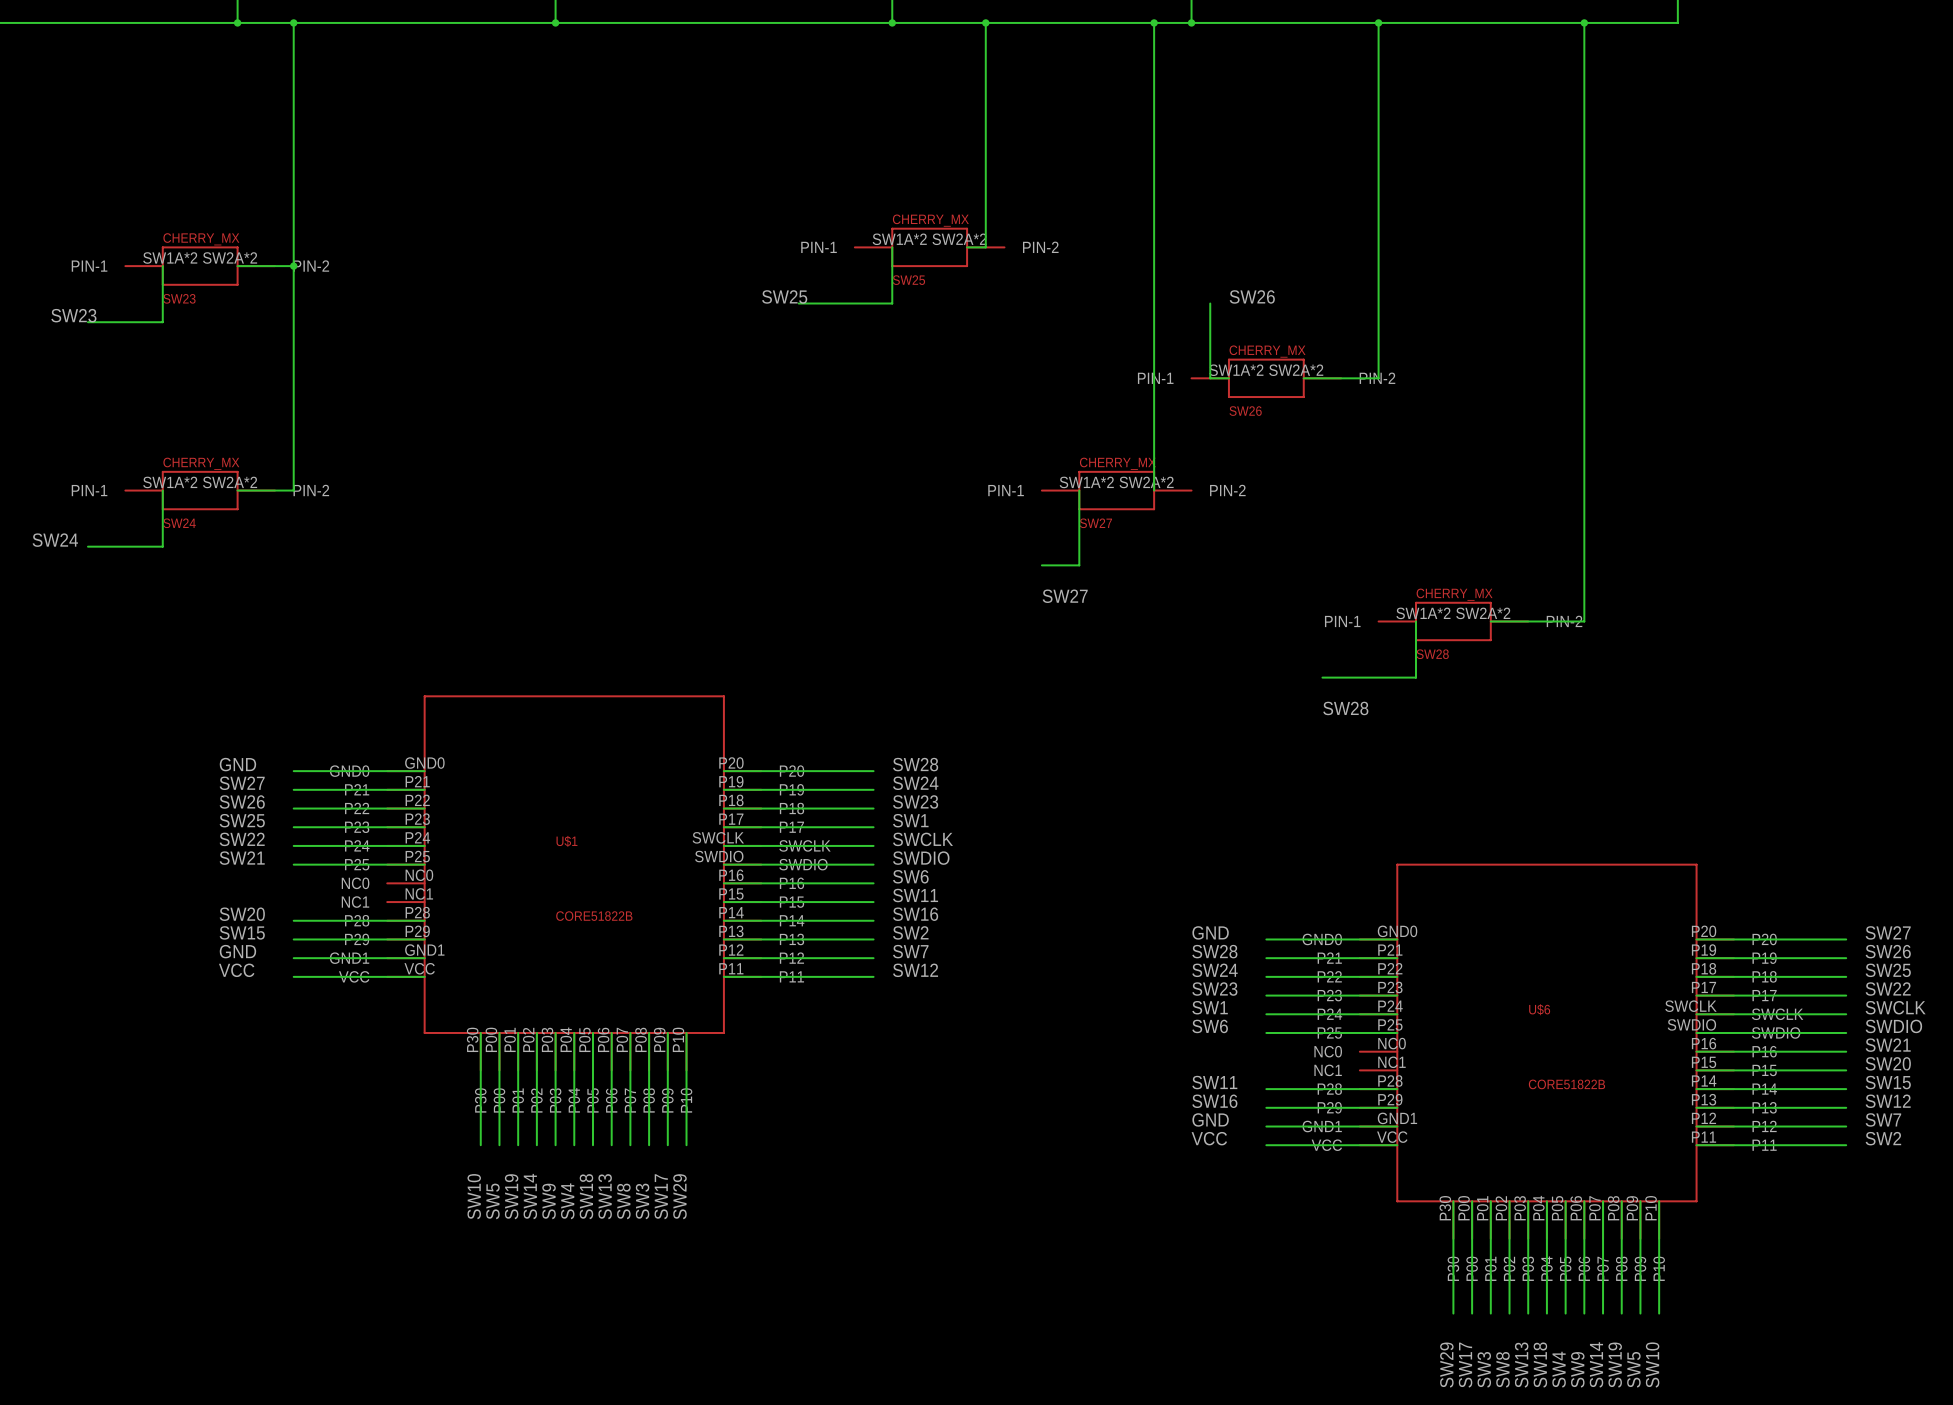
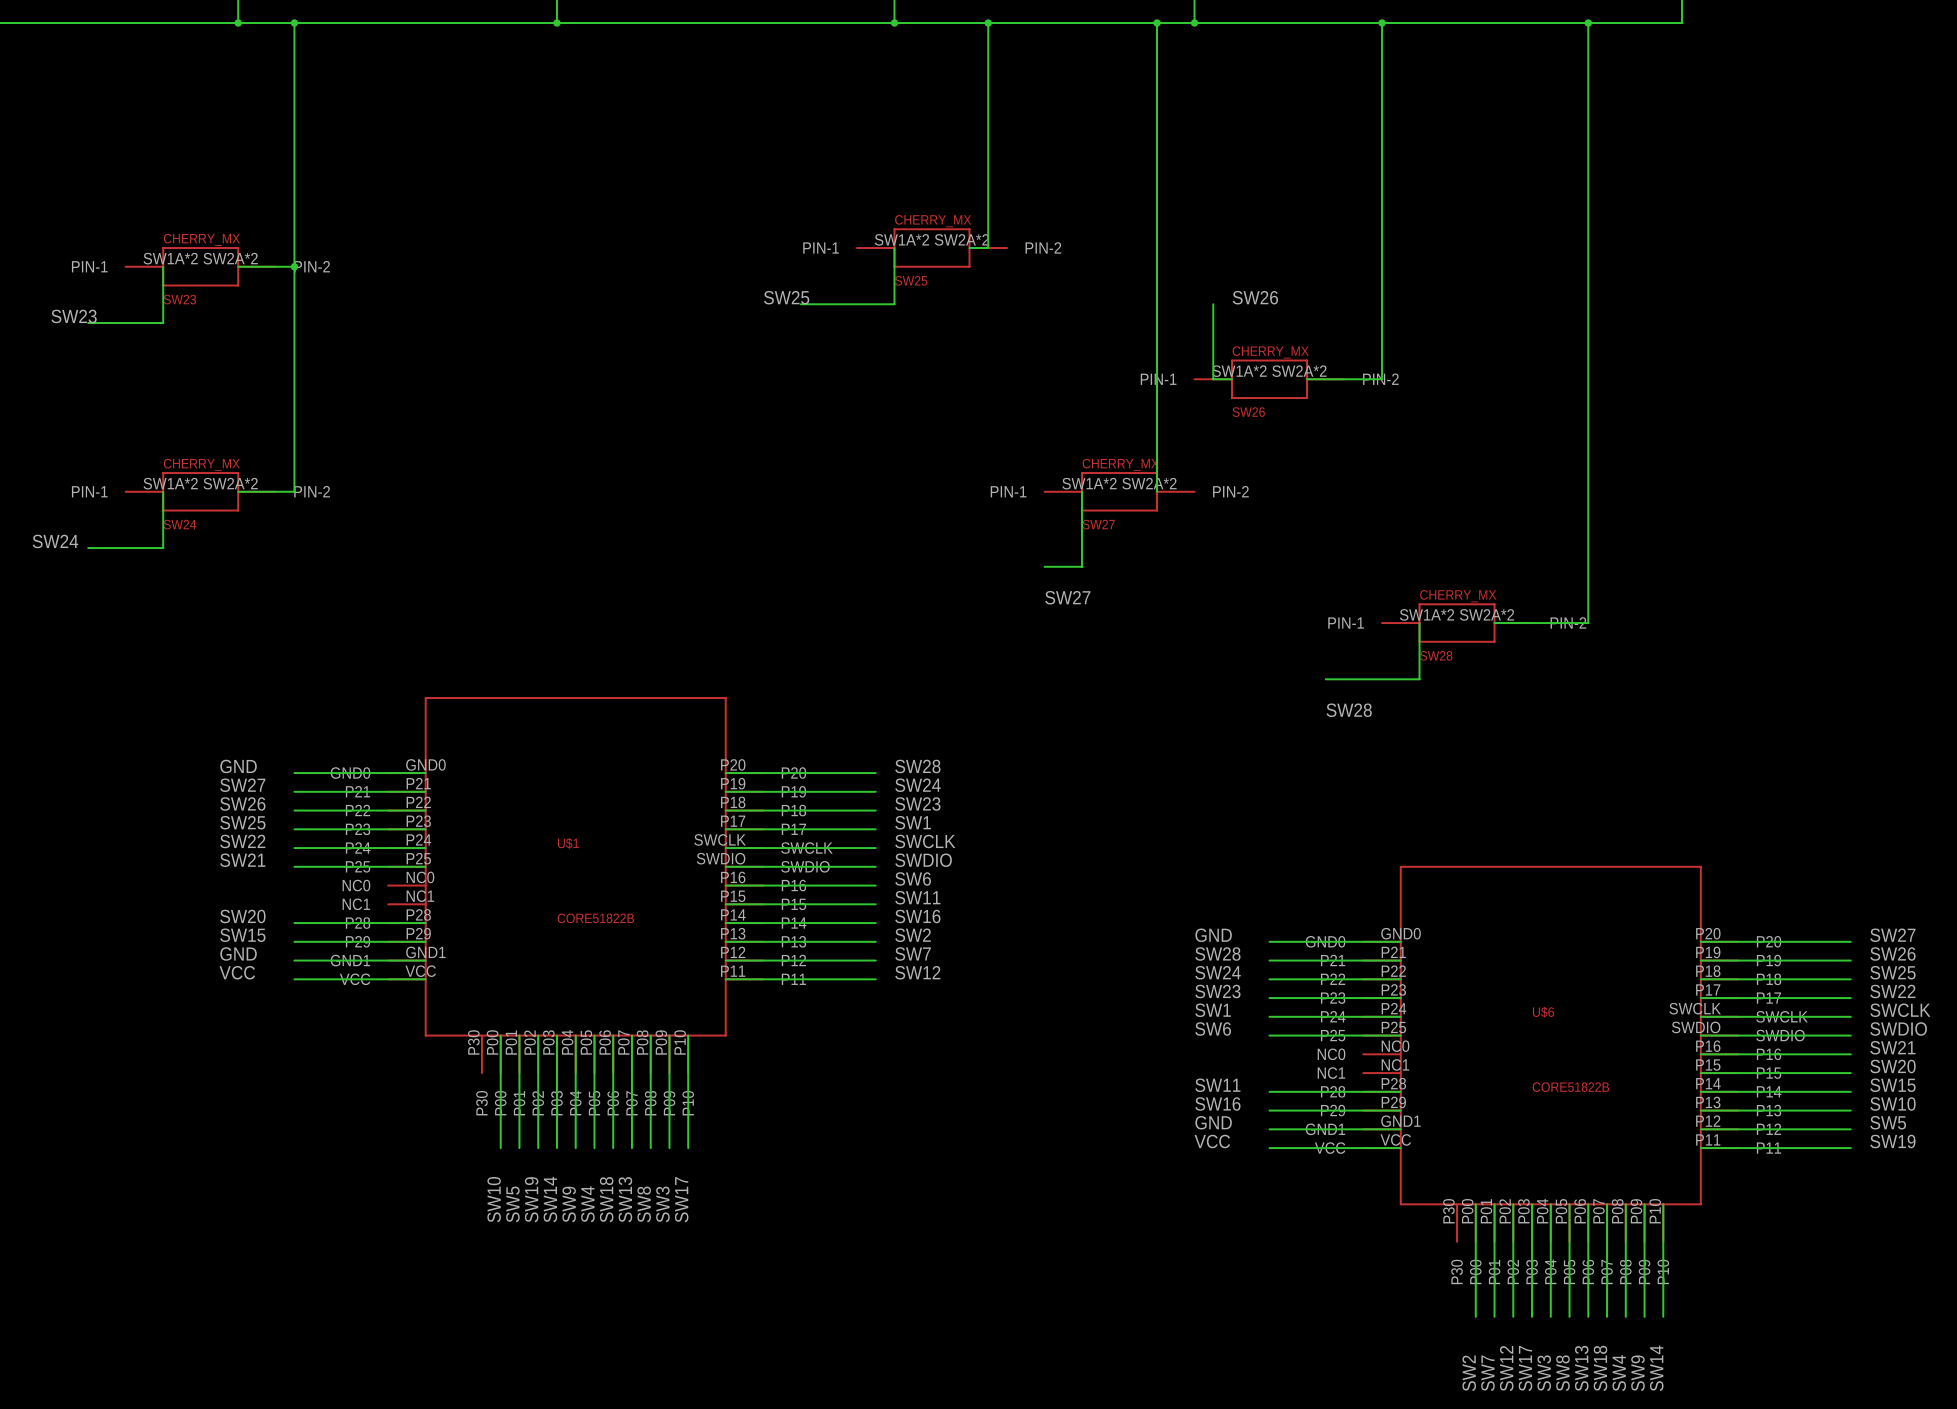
wire: (480, 1032) (480, 1145) -> none
label: SW12 (1888, 1101) -> SW10 (1892, 1104)
label: SW7 (1883, 1119) -> SW5 (1888, 1122)
label: SW2 (1883, 1138) -> SW19 (1892, 1141)
label: SW10 (474, 1196) -> none
label: SW19 (511, 1196) -> SW5 (512, 1204)
label: SW14 (530, 1196) -> SW19 (531, 1199)
label: SW18 (586, 1196) -> SW4 (587, 1204)
label: SW13 (605, 1196) -> SW18 (606, 1199)
label: SW17 (661, 1196) -> SW3 (662, 1204)
label: SW29 (679, 1196) -> SW17 (681, 1199)
label: SW5 (492, 1201) -> SW10 (494, 1199)
label: SW9 (549, 1201) -> SW14 (550, 1199)
label: SW4 (567, 1201) -> SW9 (569, 1204)
label: SW8 (623, 1201) -> SW13 (625, 1199)
label: SW3 (642, 1201) -> SW8 (644, 1204)
wire: (1453, 1201) (1453, 1313) -> none
label: SW14 (1596, 1364) -> SW18 (1600, 1368)
label: SW29 (1446, 1365) -> none
label: SW17 (1465, 1365) -> SW2 (1469, 1373)
label: SW13 (1521, 1365) -> SW17 (1525, 1368)
label: SW18 (1540, 1365) -> SW3 (1544, 1373)
label: SW19 (1615, 1365) -> SW4 (1619, 1373)
label: SW10 (1652, 1365) -> SW14 (1656, 1368)
label: SW3 (1484, 1369) -> SW7 (1487, 1373)
label: SW8 (1502, 1369) -> SW12 (1506, 1368)
label: SW4 (1559, 1369) -> SW8 (1562, 1373)
label: SW9 (1577, 1369) -> SW13 (1581, 1368)
label: SW5 (1633, 1369) -> SW9 (1637, 1373)

